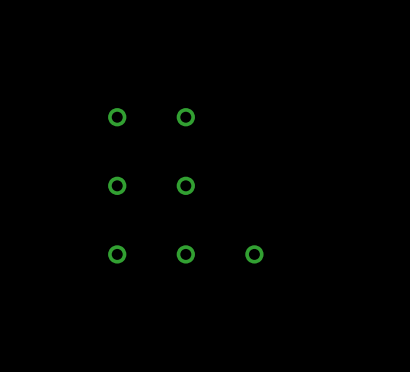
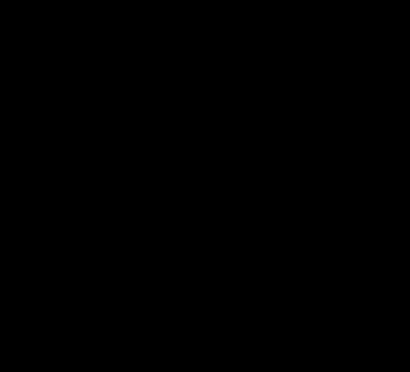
via: (117, 117) -> none
via: (185, 117) -> none
via: (117, 185) -> none
via: (185, 185) -> none
via: (117, 254) -> none
via: (185, 254) -> none
via: (254, 254) -> none

